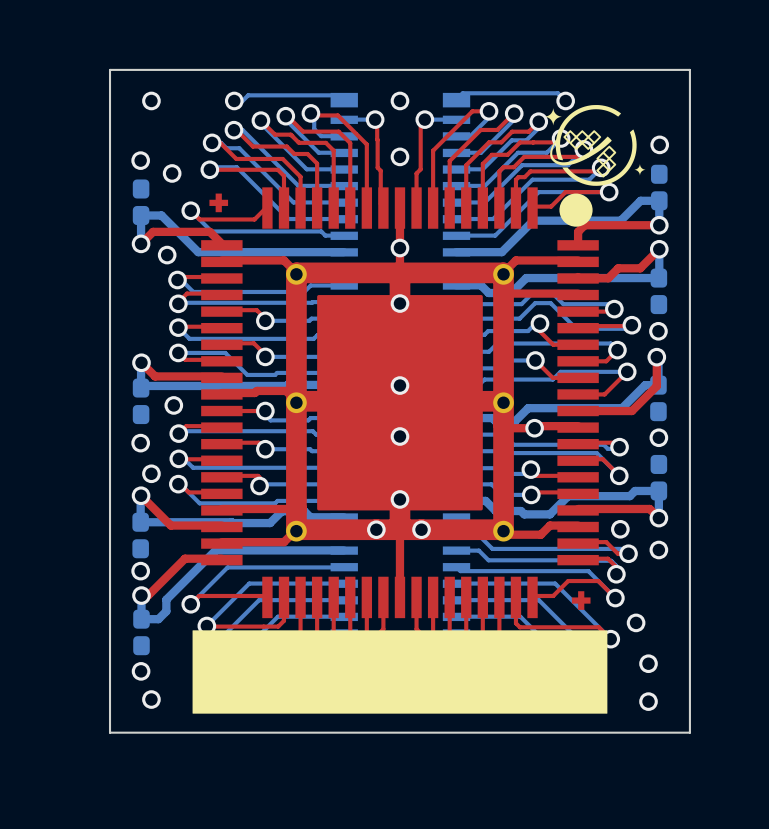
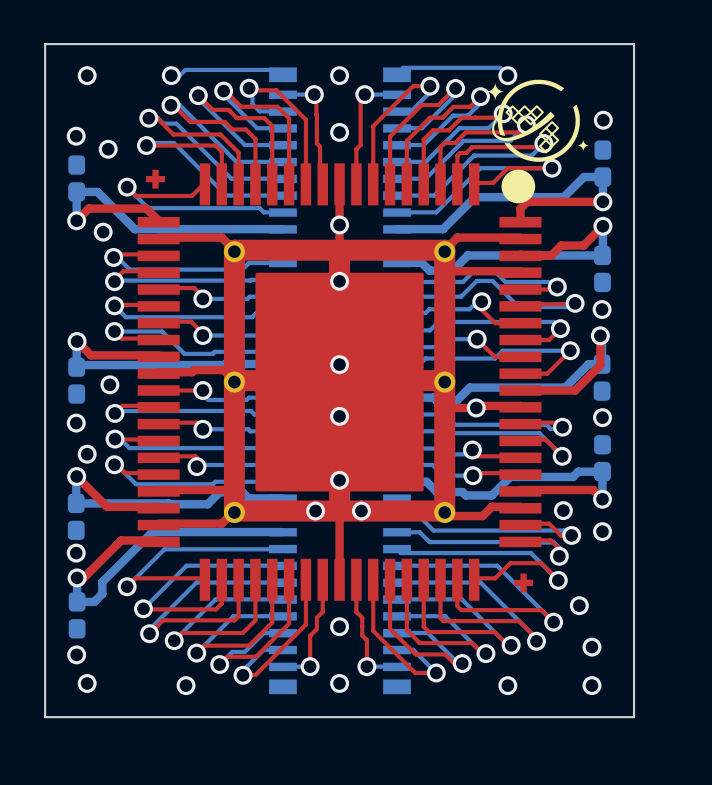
drawing: [192, 630, 608, 714] -> none

